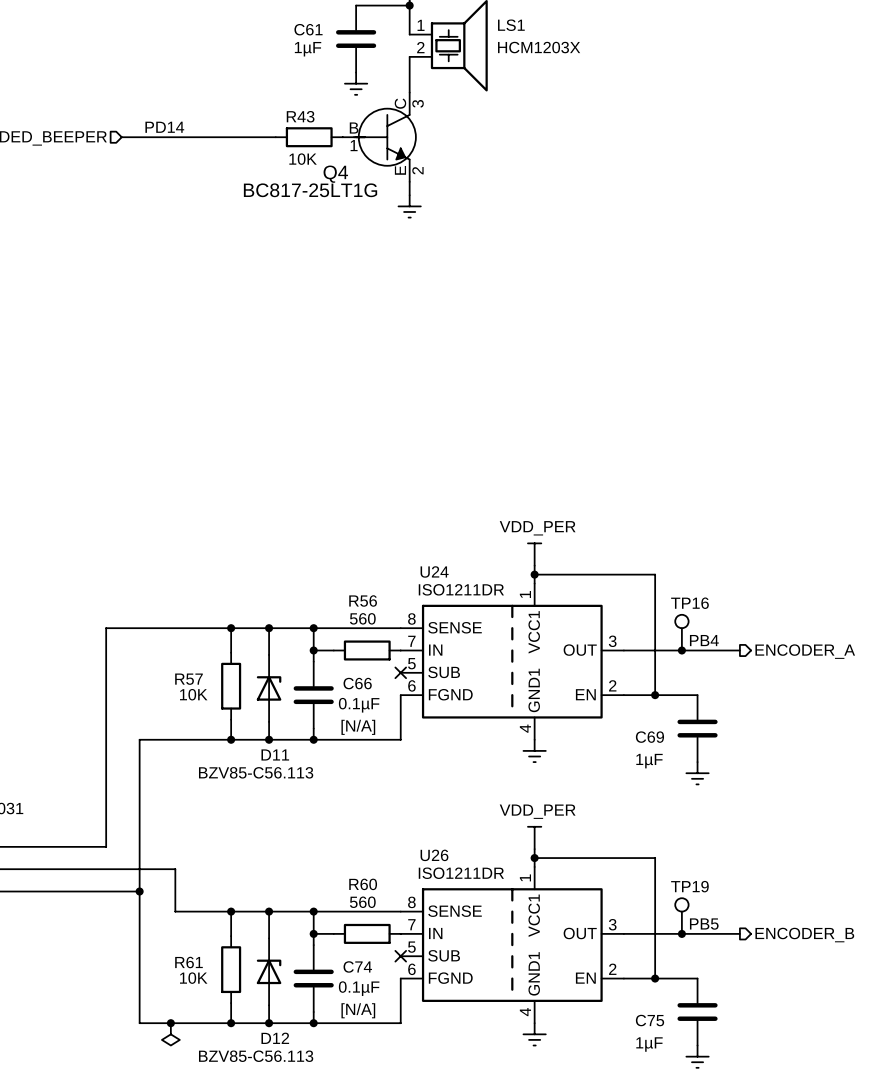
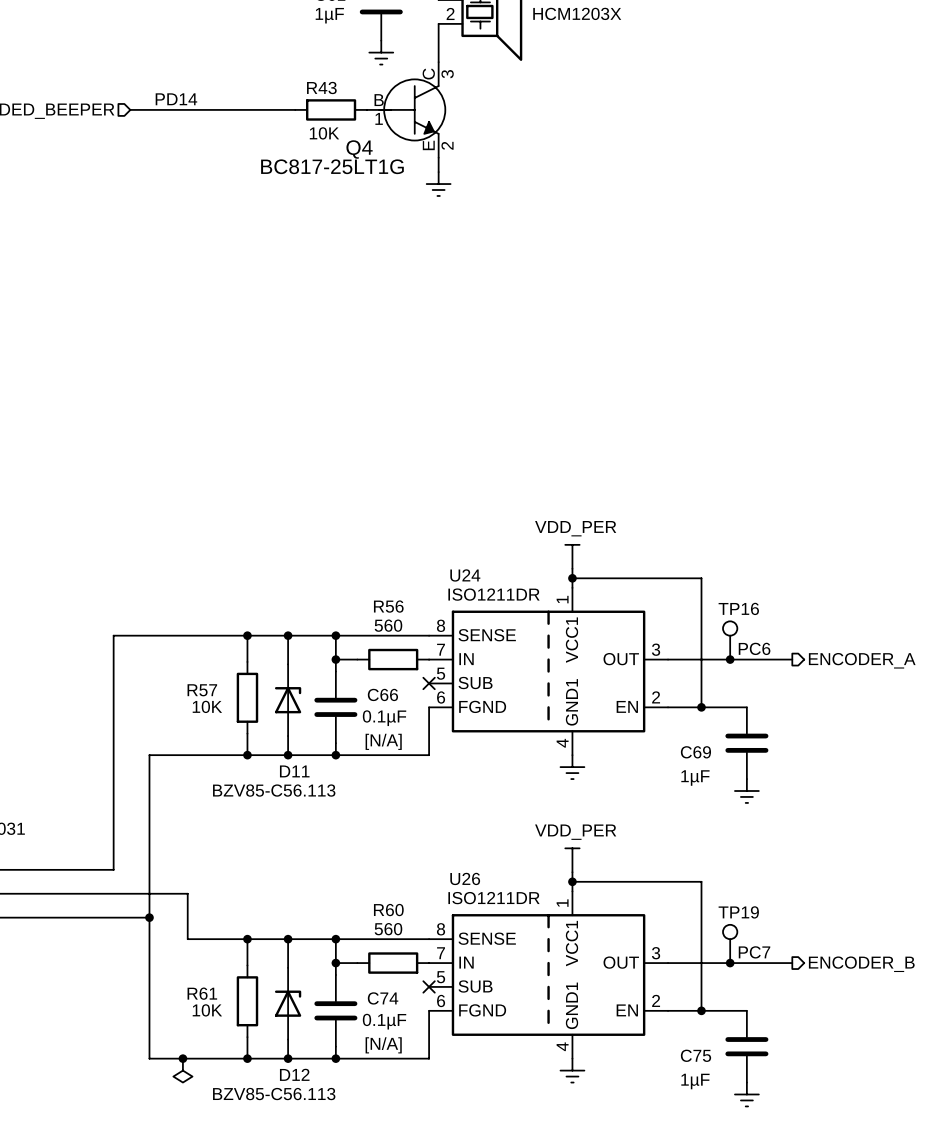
label: PB4 (704, 640) -> PC6 (754, 648)
label: PB5 (704, 924) -> PC7 (754, 952)

